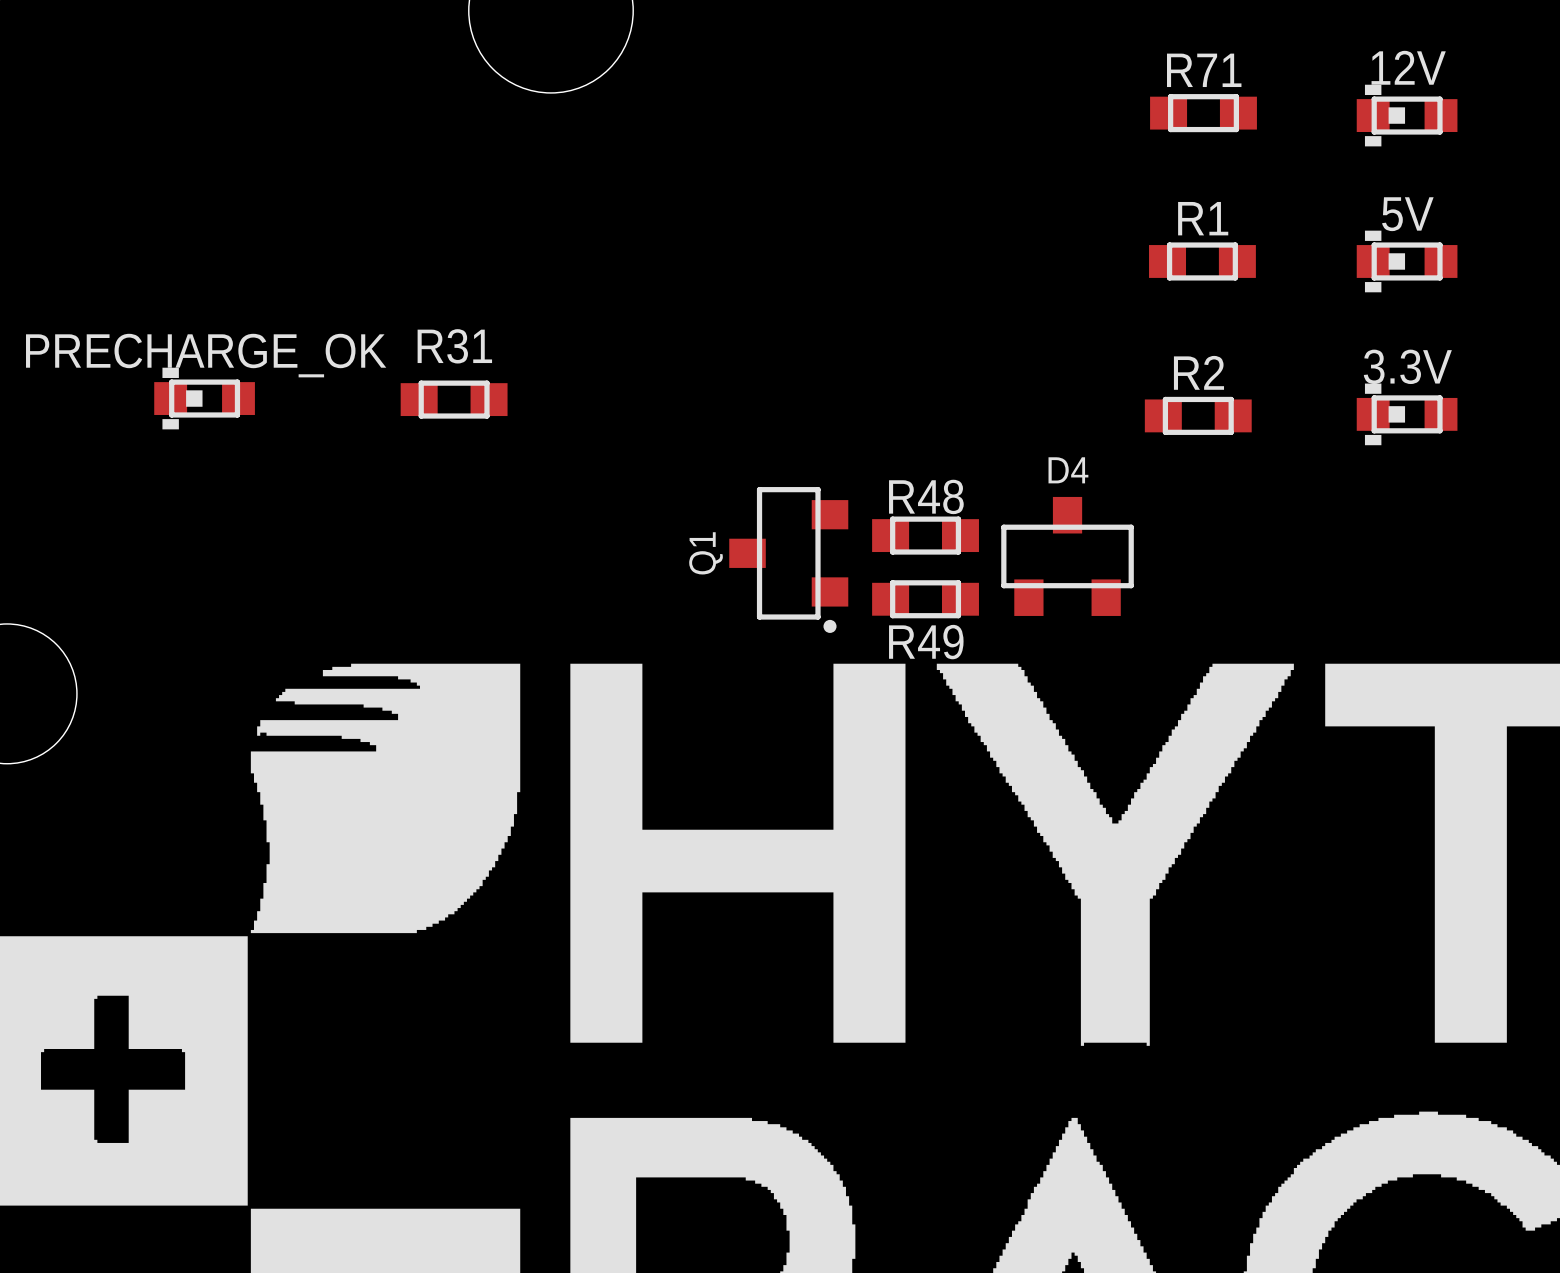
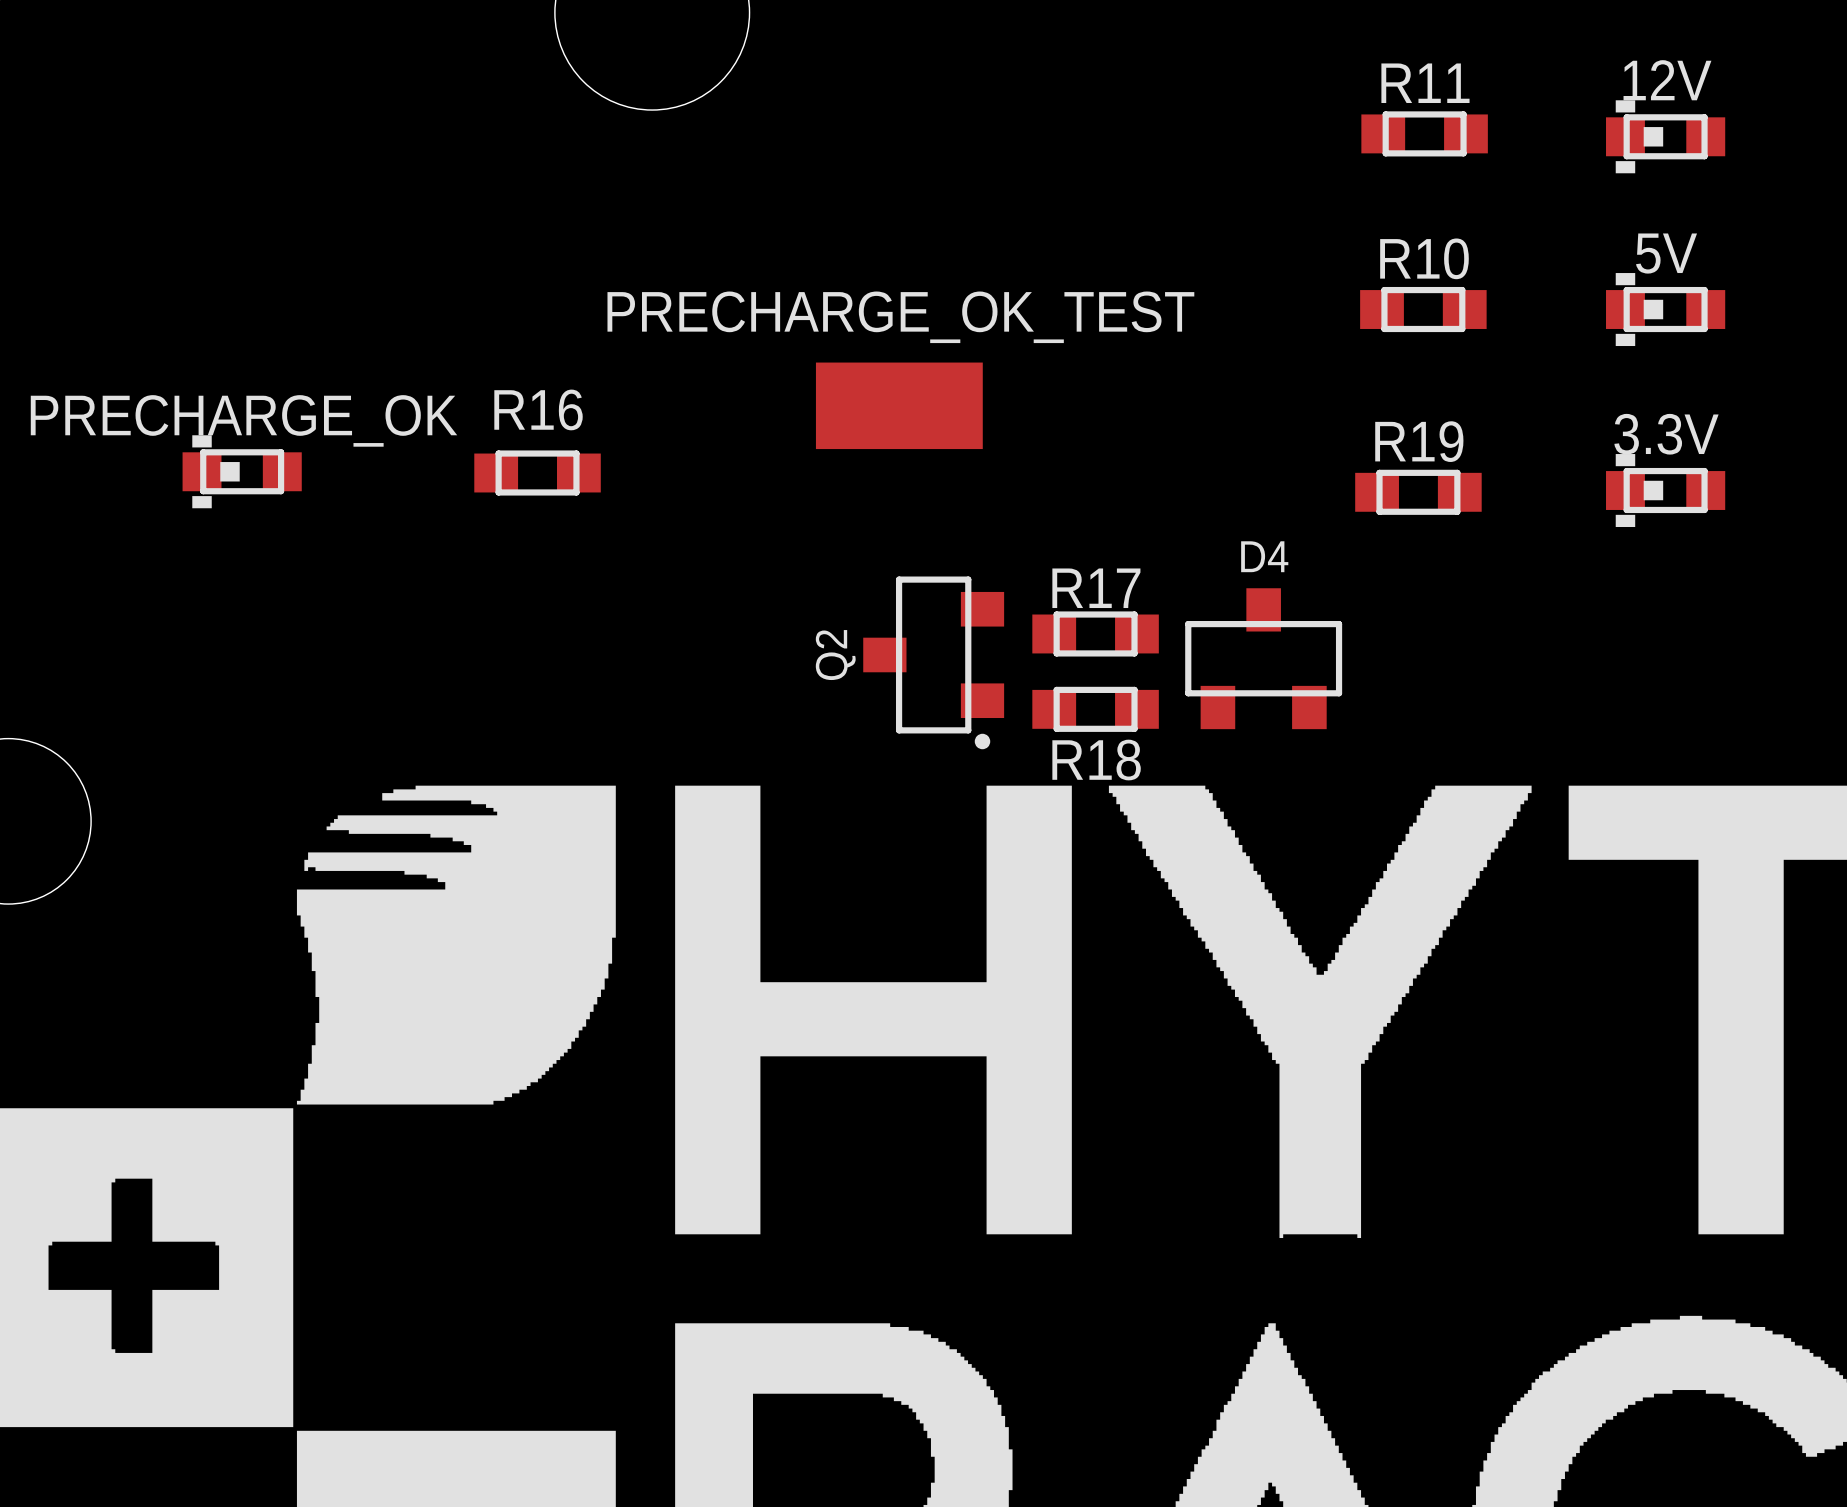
R71 name: R71 (1204, 70) -> R11 (1425, 83)
R1 name: R1 (1203, 218) -> R10 (1424, 258)
PRECHARGE_OK_TEST: none -> (899, 405)
R31 name: R31 (454, 346) -> R16 (538, 409)
R2 name: R2 (1198, 372) -> R19 (1419, 441)
R48 name: R48 (926, 496) -> R17 (1096, 588)
Q1 name: Q1 (706, 553) -> Q2 (835, 655)
R49 name: R49 (926, 642) -> R18 (1096, 760)

